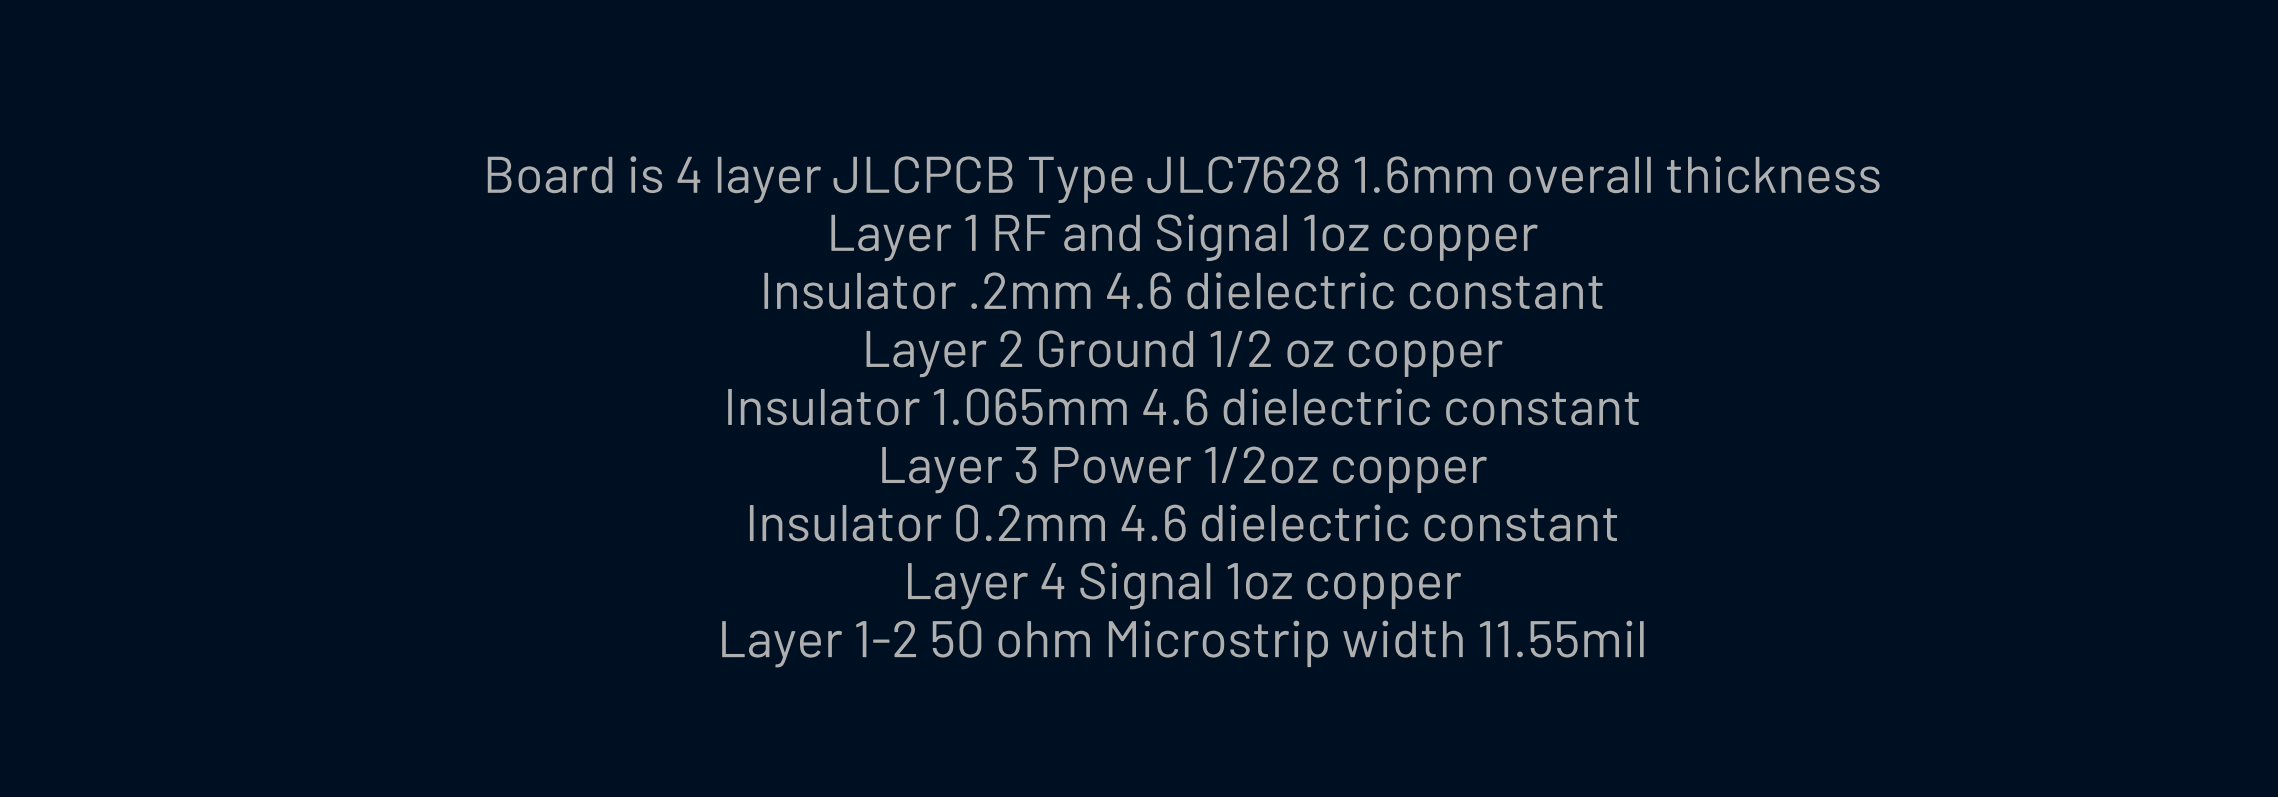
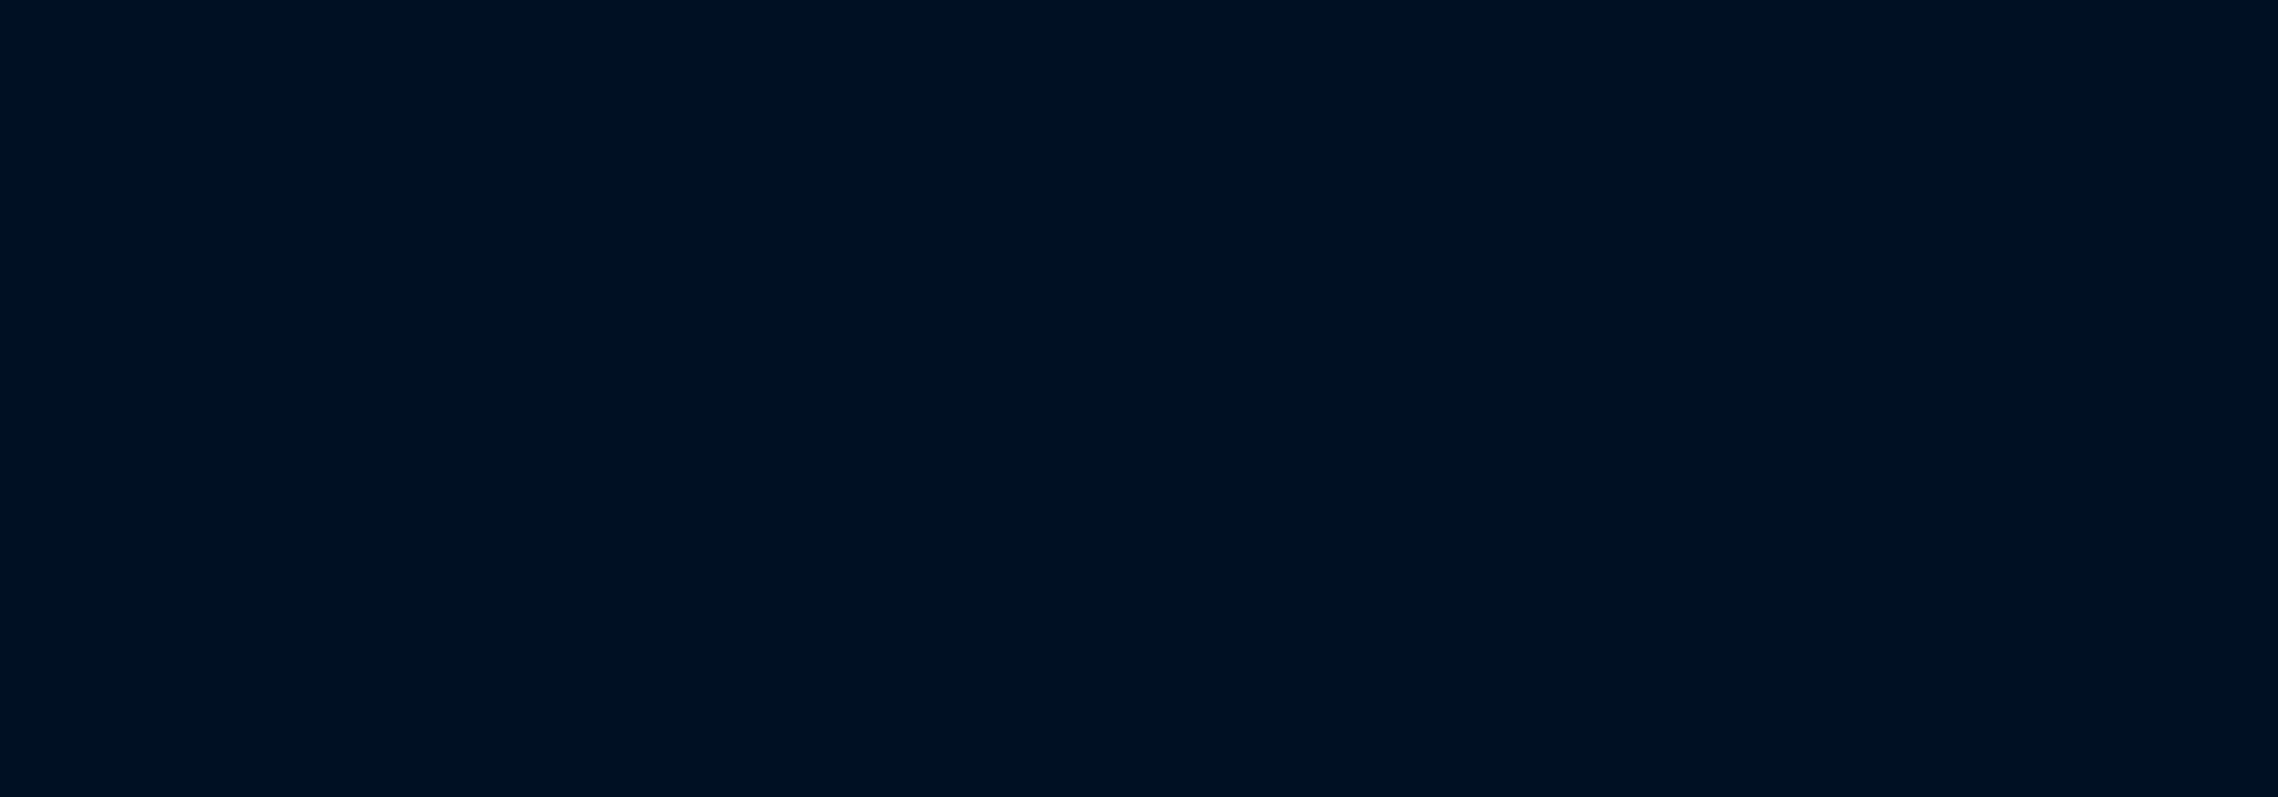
text: Board is 4 layer JLCPCB Type JLC7628 1.6mm overall thickness (1183, 179) -> none
text: Layer 1 RF and Signal 1oz copper (1184, 237) -> none
text: Insulator .2mm 4.6 dielectric constant (1183, 290) -> none
text: Layer 2 Ground 1/2 oz copper (1184, 353) -> none
text: Insulator 1.065mm 4.6 dielectric constant (1183, 406) -> none
text: Layer 3 Power 1/2oz copper (1184, 469) -> none
text: Insulator 0.2mm 4.6 dielectric constant (1183, 523) -> none
text: Layer 4 Signal 1oz copper (1184, 585) -> none
text: Layer 1-2 50 ohm Microstrip width 11.55mil (1182, 644) -> none

